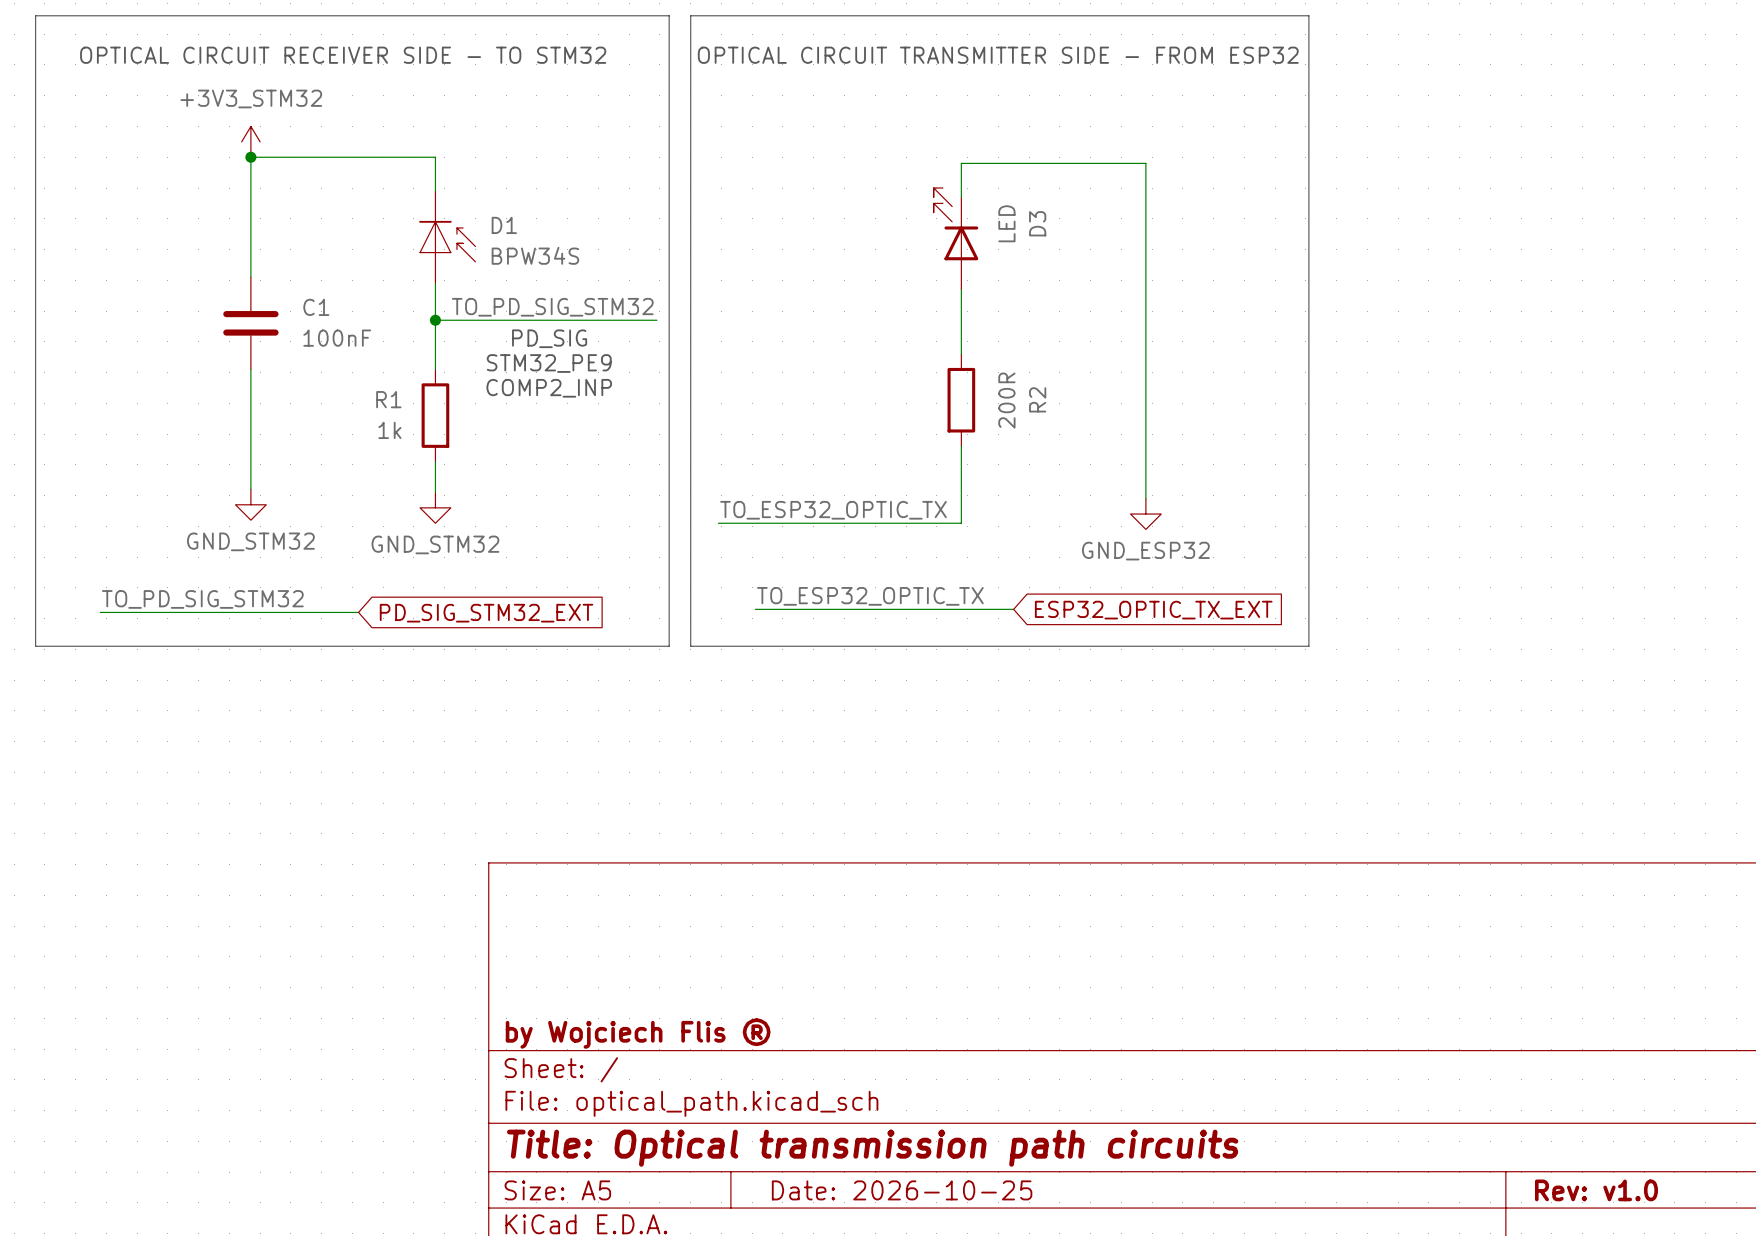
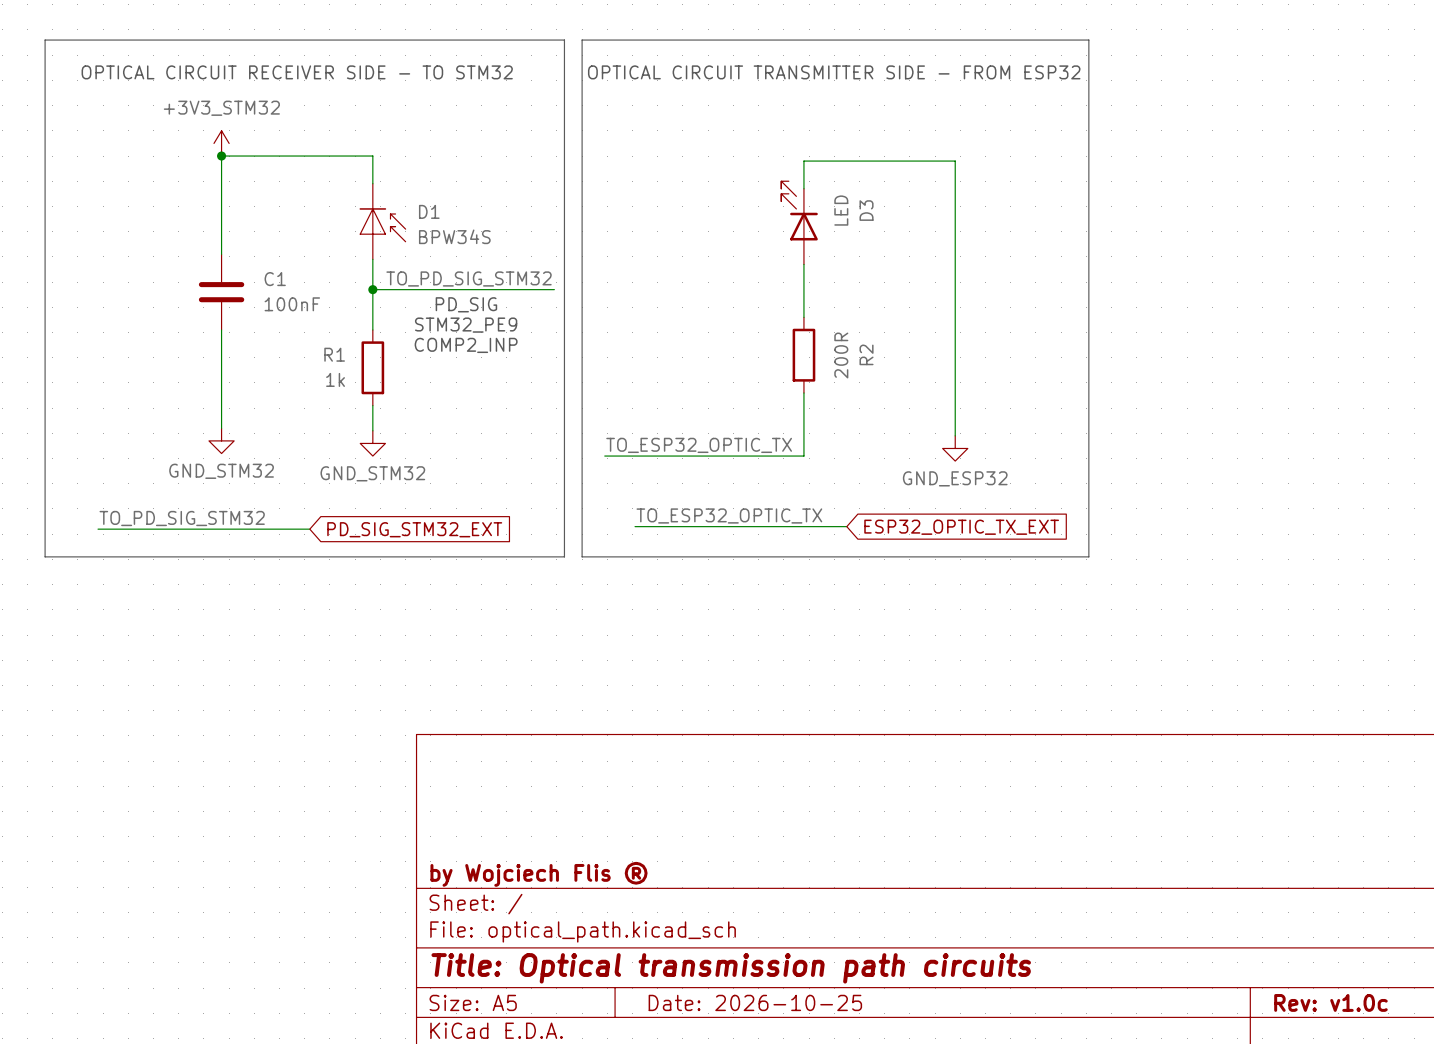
title block: Rev: v1.0 (1596, 1190) -> Rev: v1.0c (1330, 1002)

